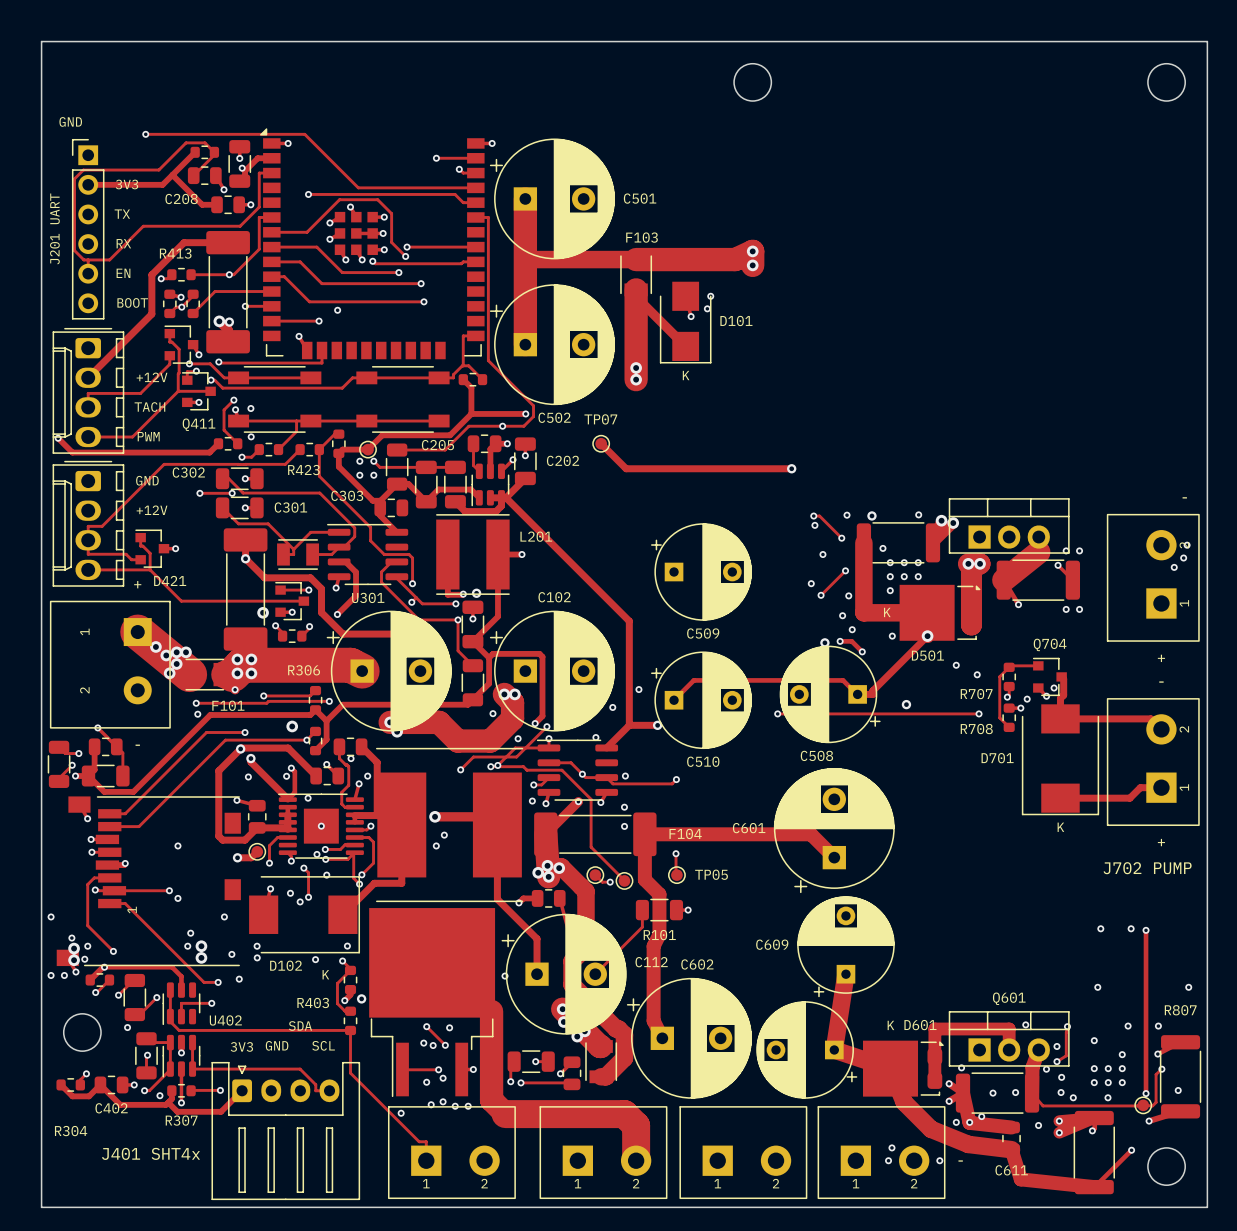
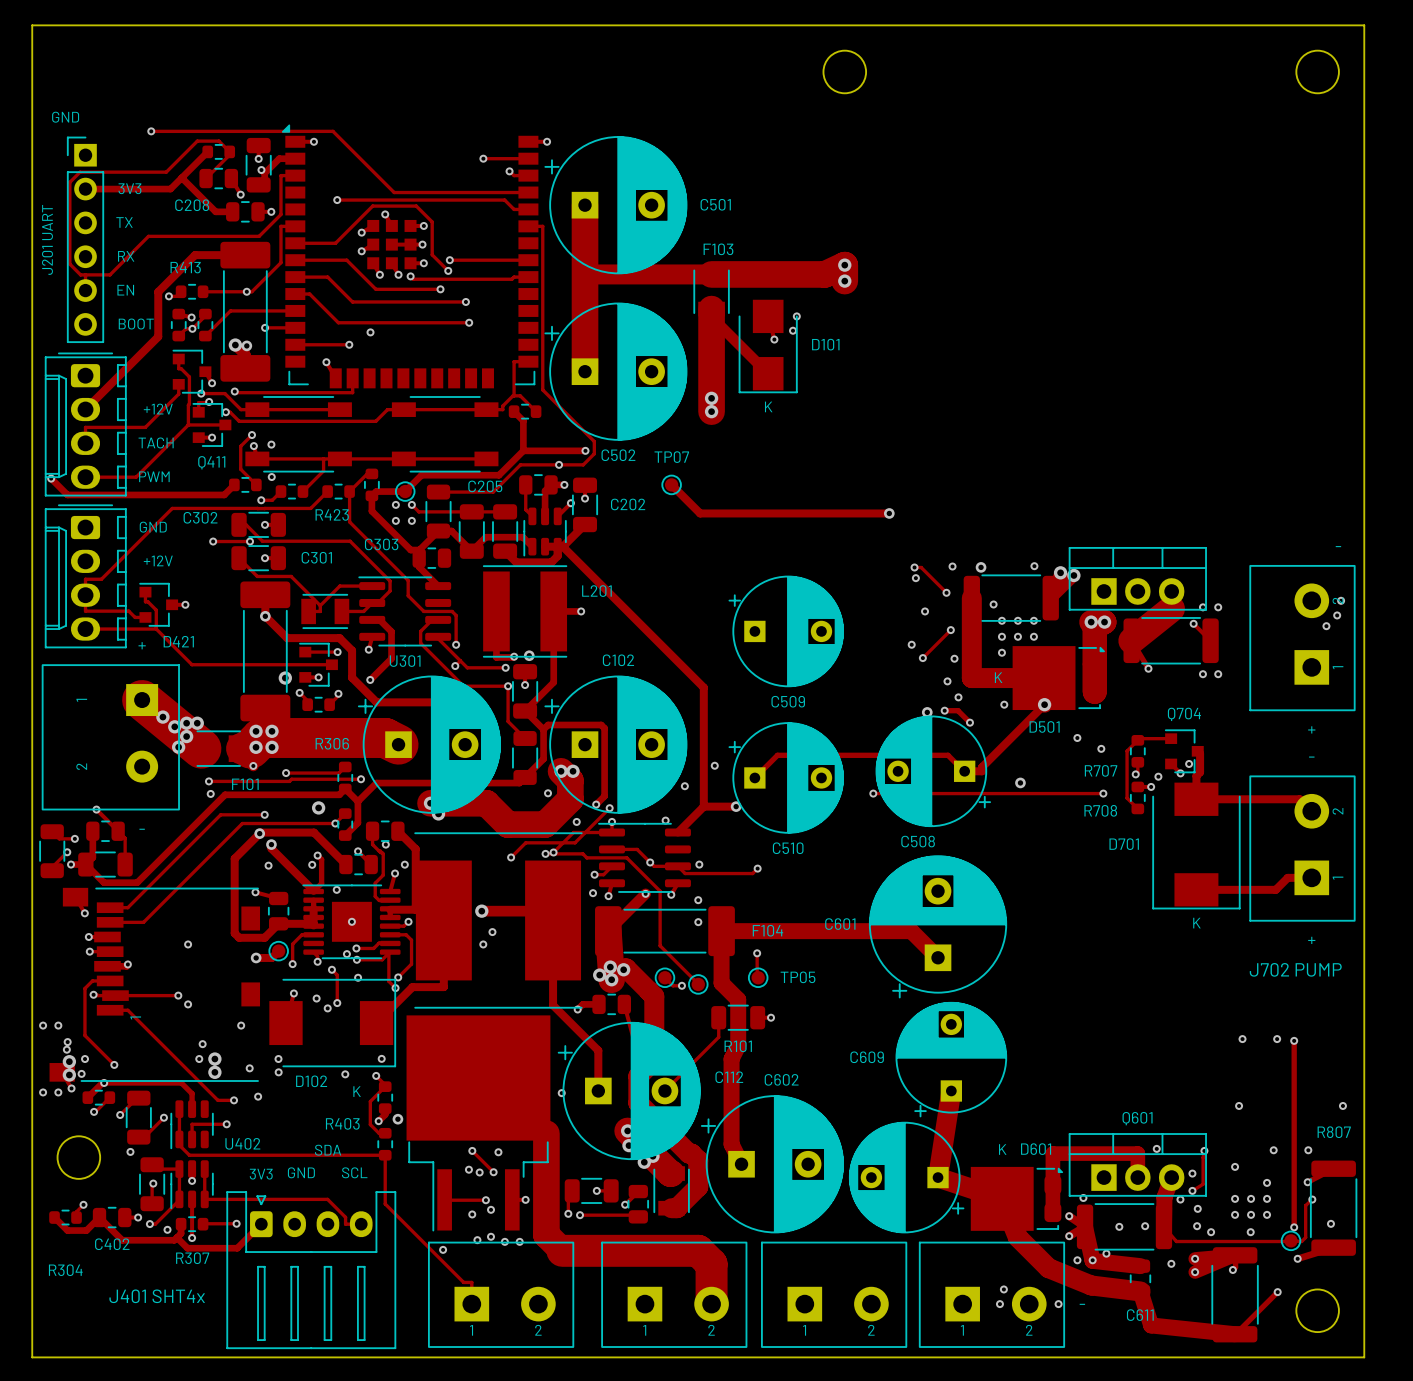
via: none -> (58, 1025)
via: none -> (67, 1042)

